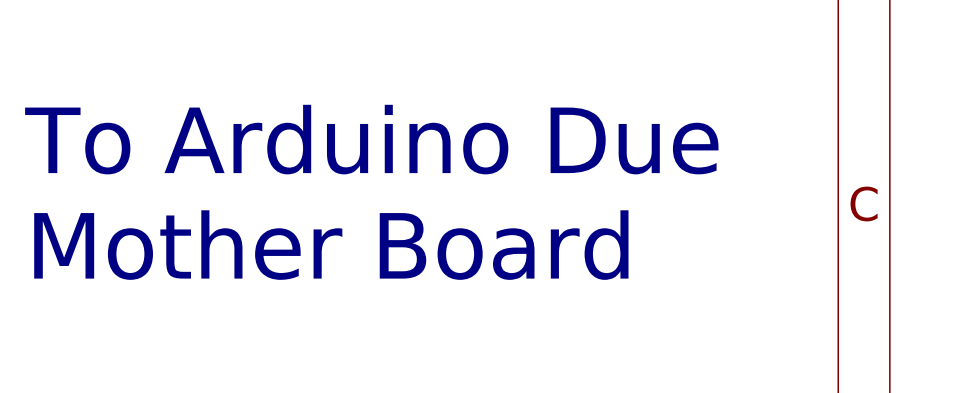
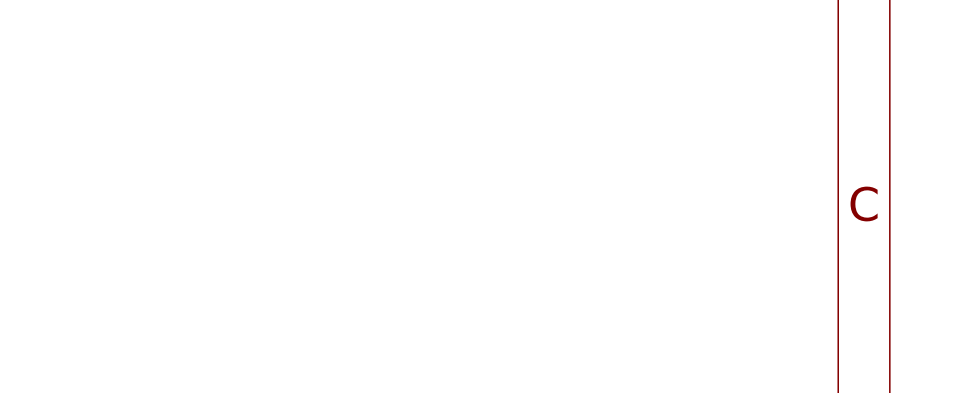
text: To Arduino Due (371, 139) -> none
text: Mother Board (331, 245) -> none

